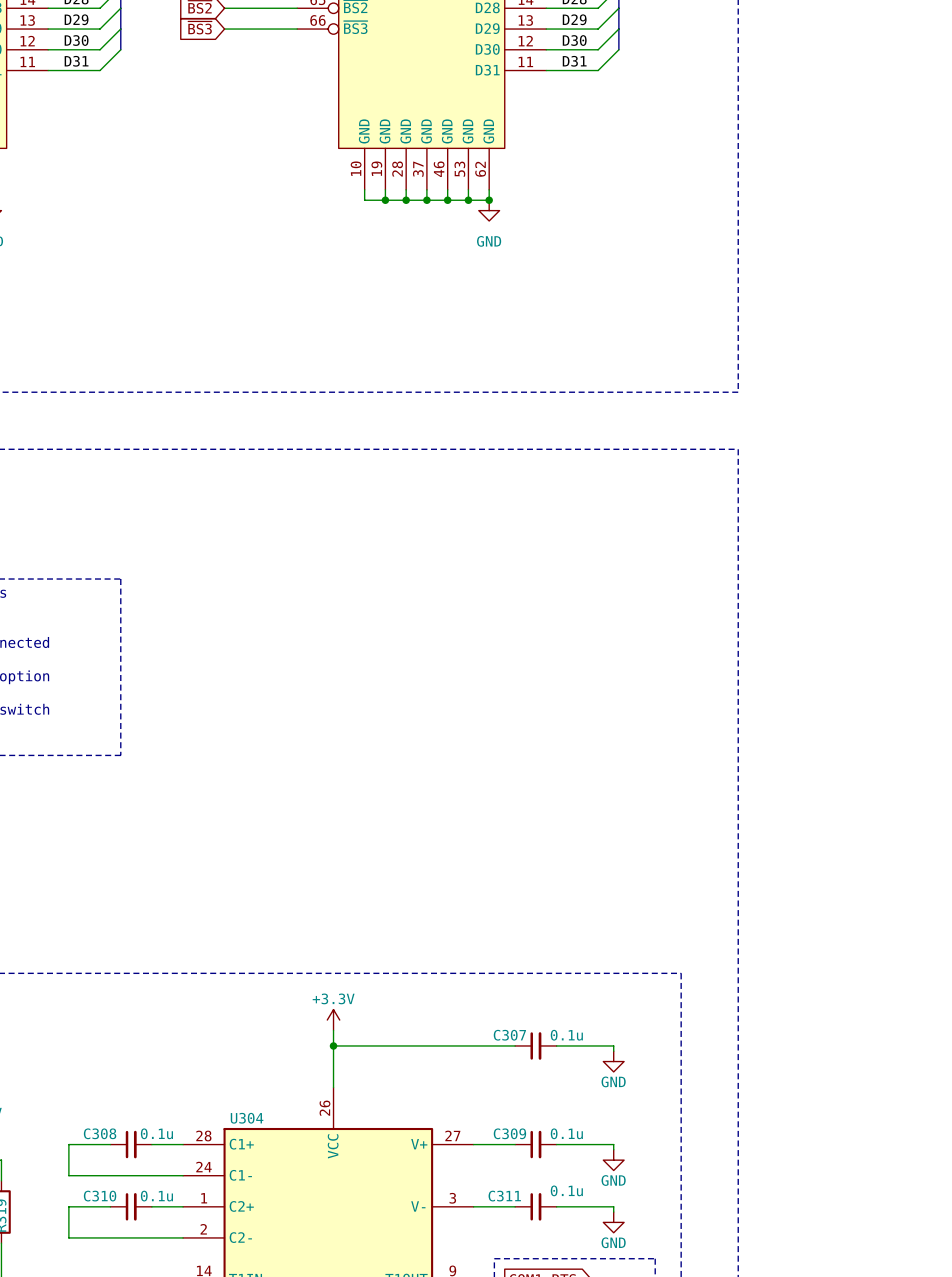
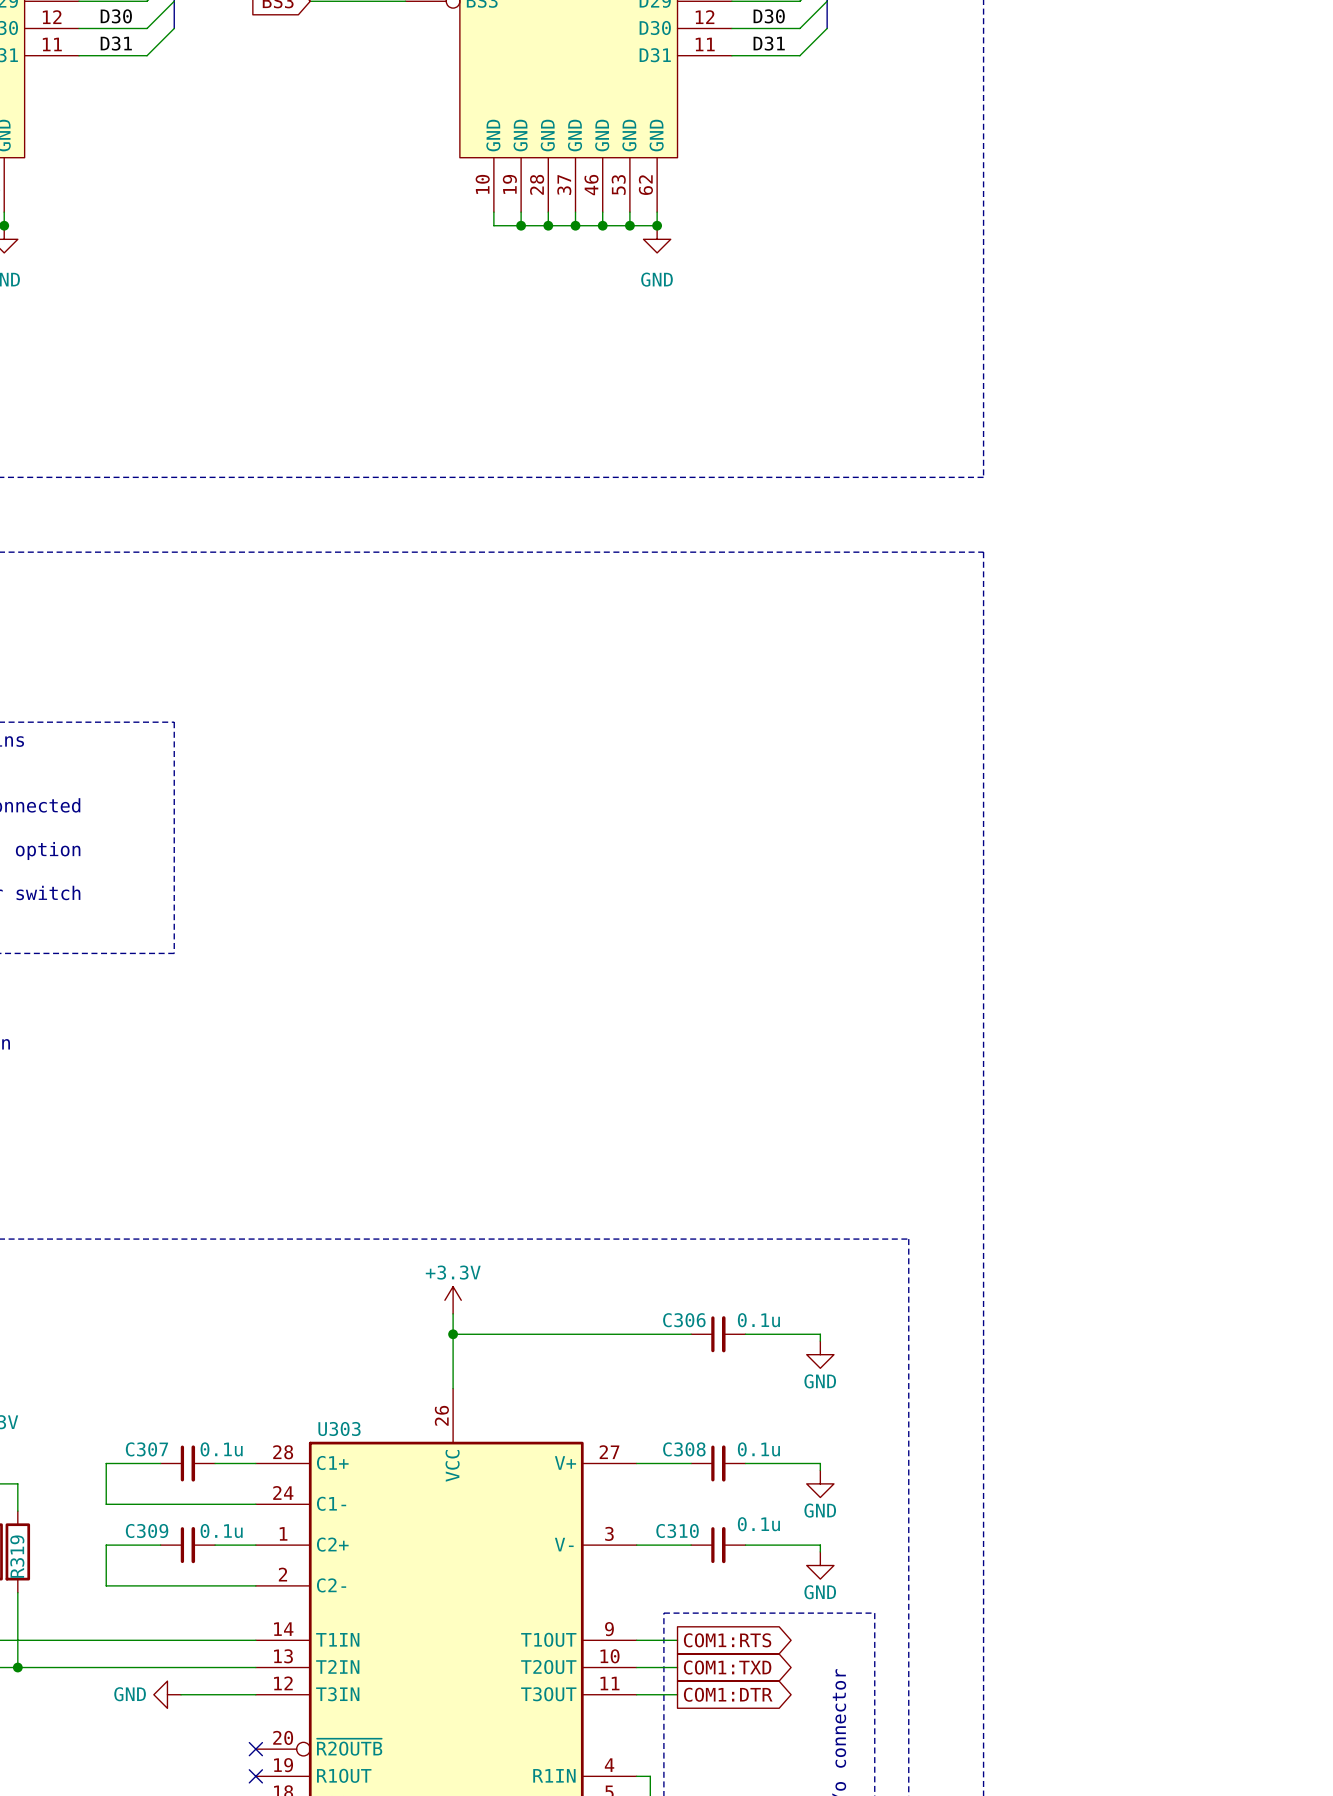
C307 name: C307 (509, 1035) -> C306 (684, 1320)
U304 name: U304 (247, 1118) -> U303 (339, 1428)
C308 name: C308 (100, 1133) -> C307 (146, 1449)
C309 name: C309 (509, 1133) -> C308 (684, 1449)
C310 name: C310 (100, 1196) -> C309 (147, 1531)
C311 name: C311 (504, 1196) -> C310 (677, 1531)

